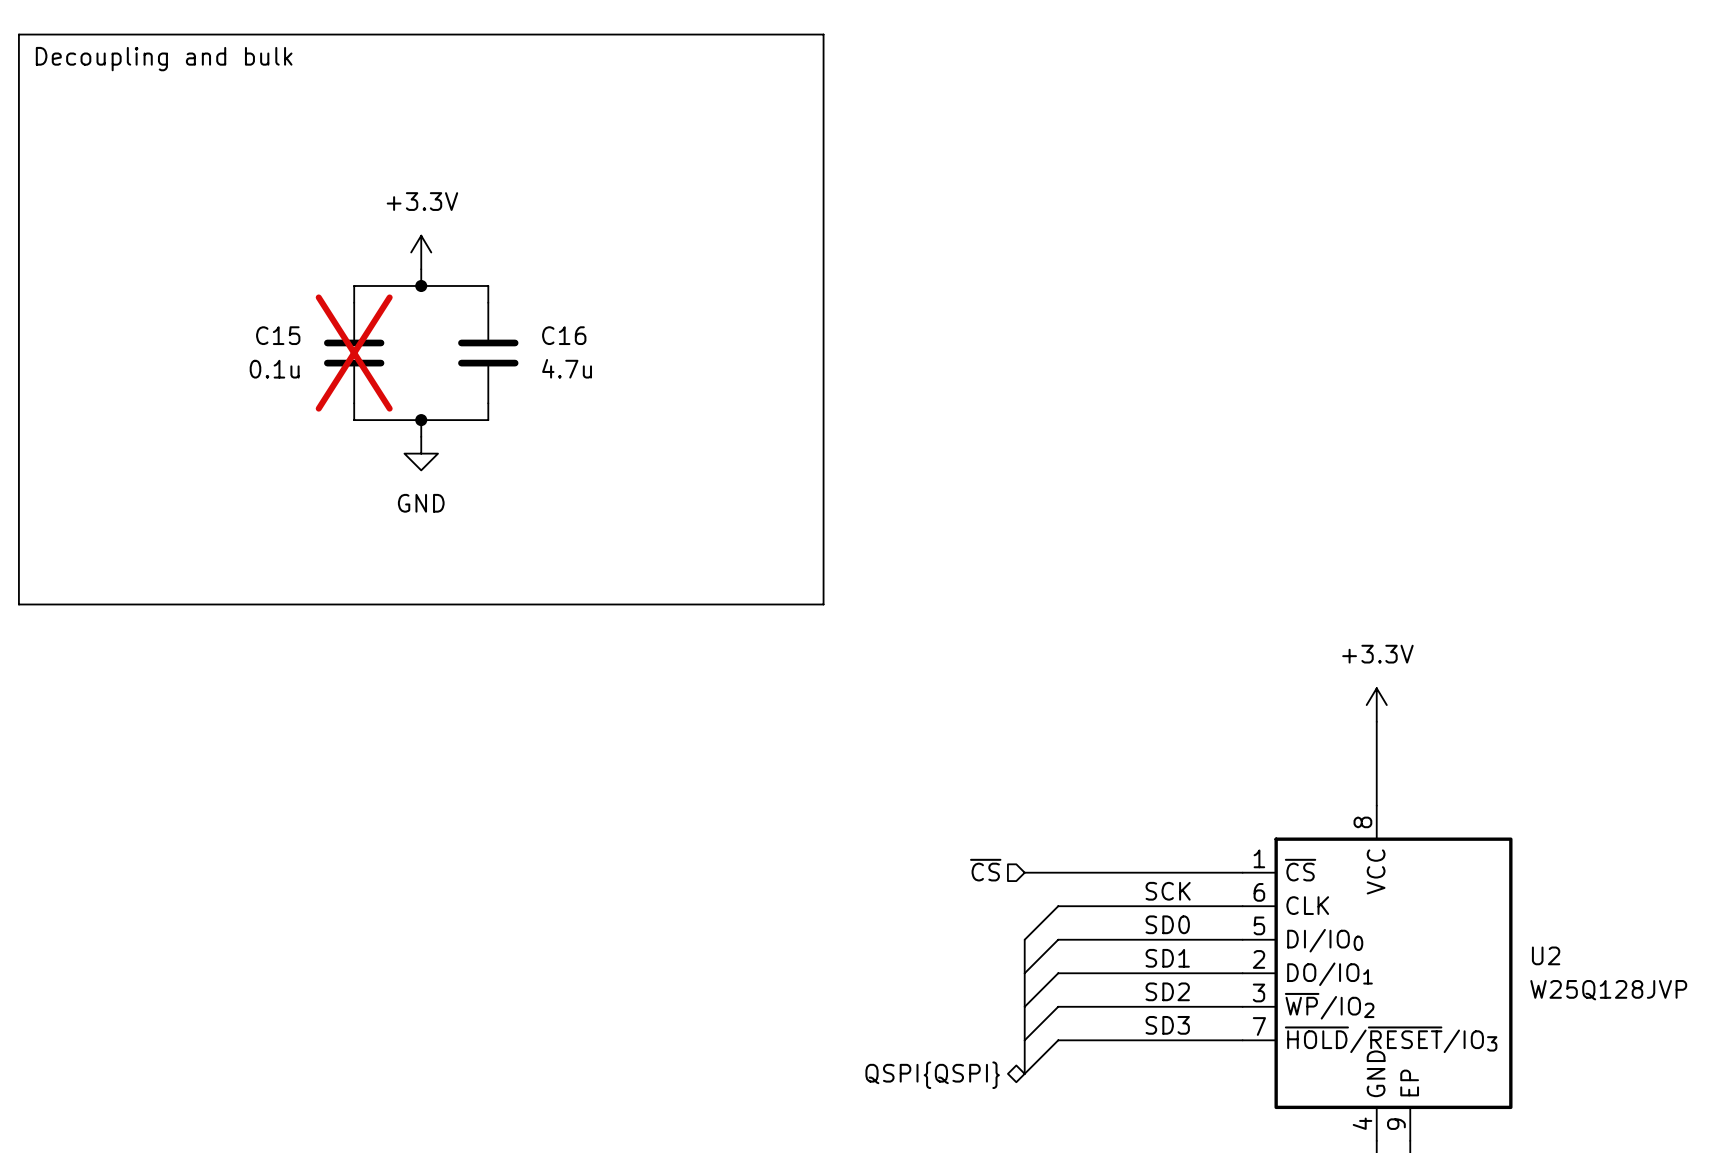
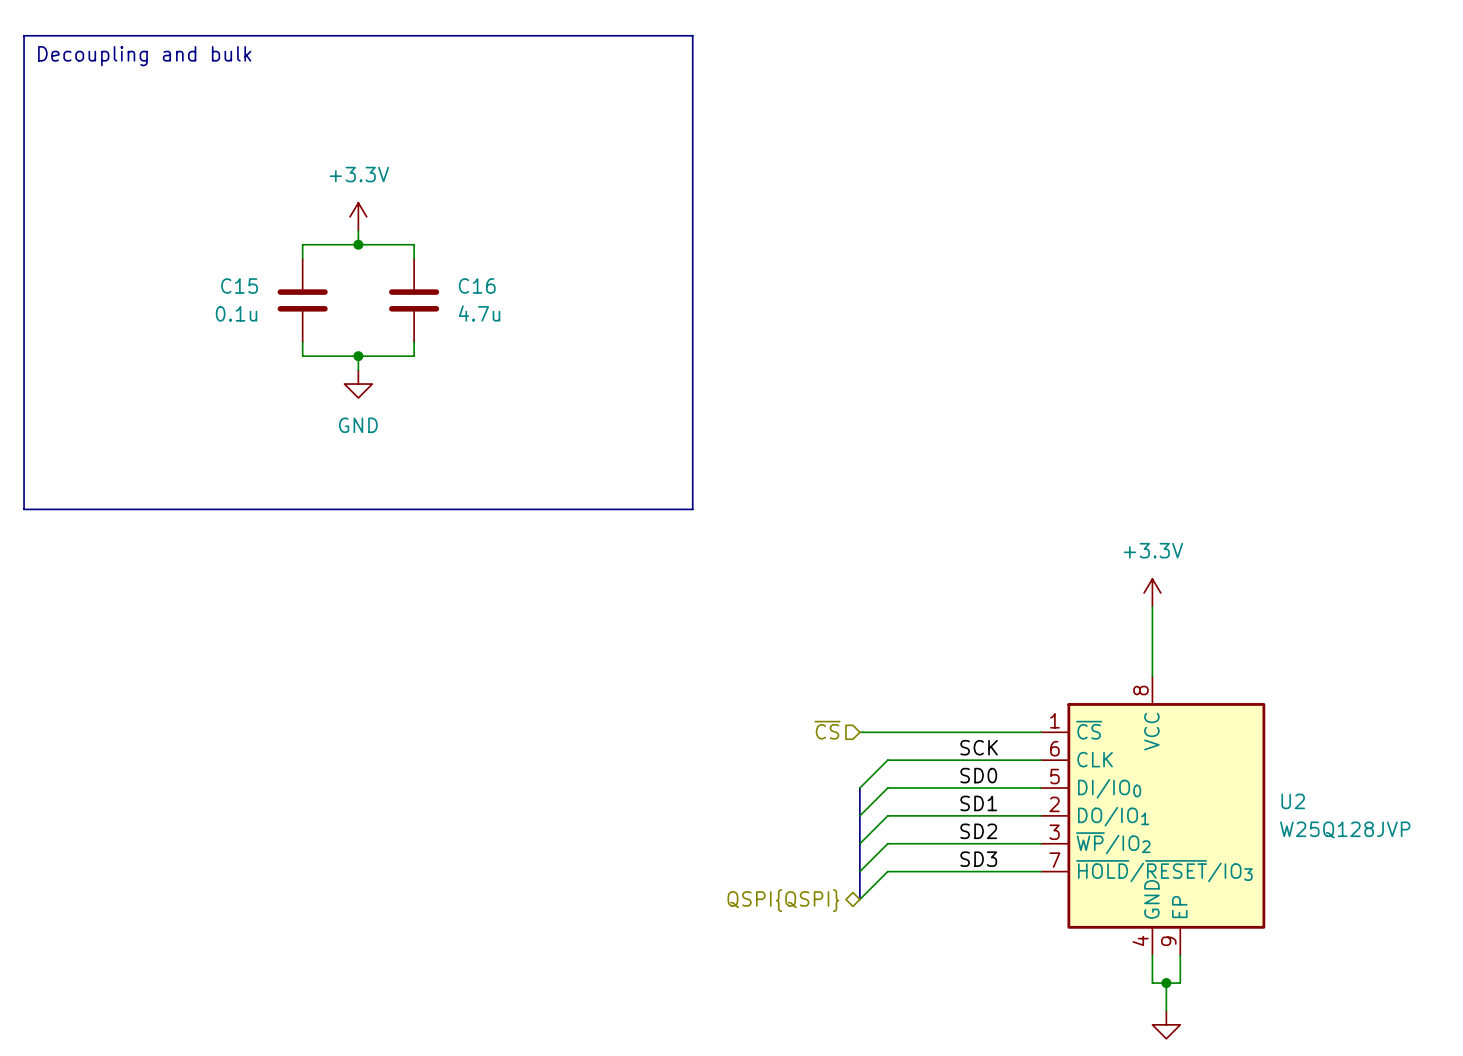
C15 do-not-place cross: (354, 353) -> none

